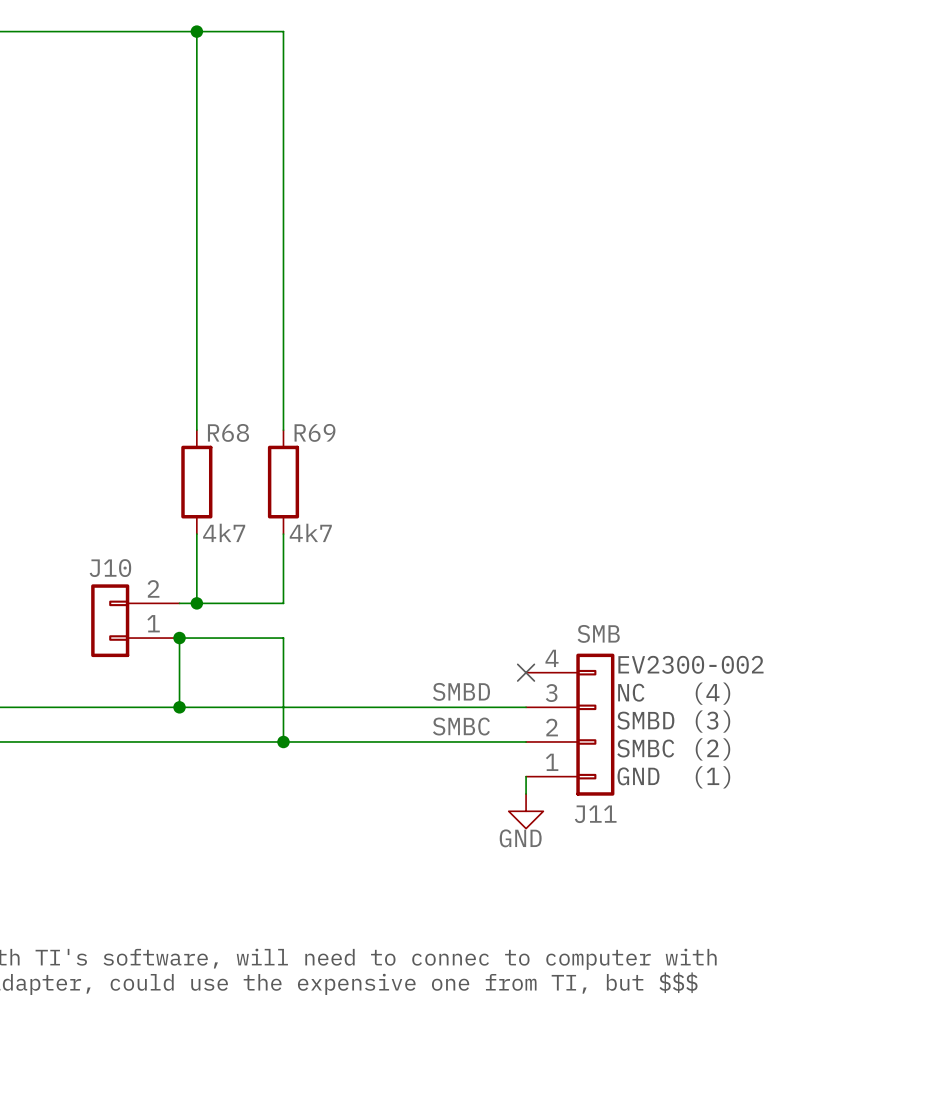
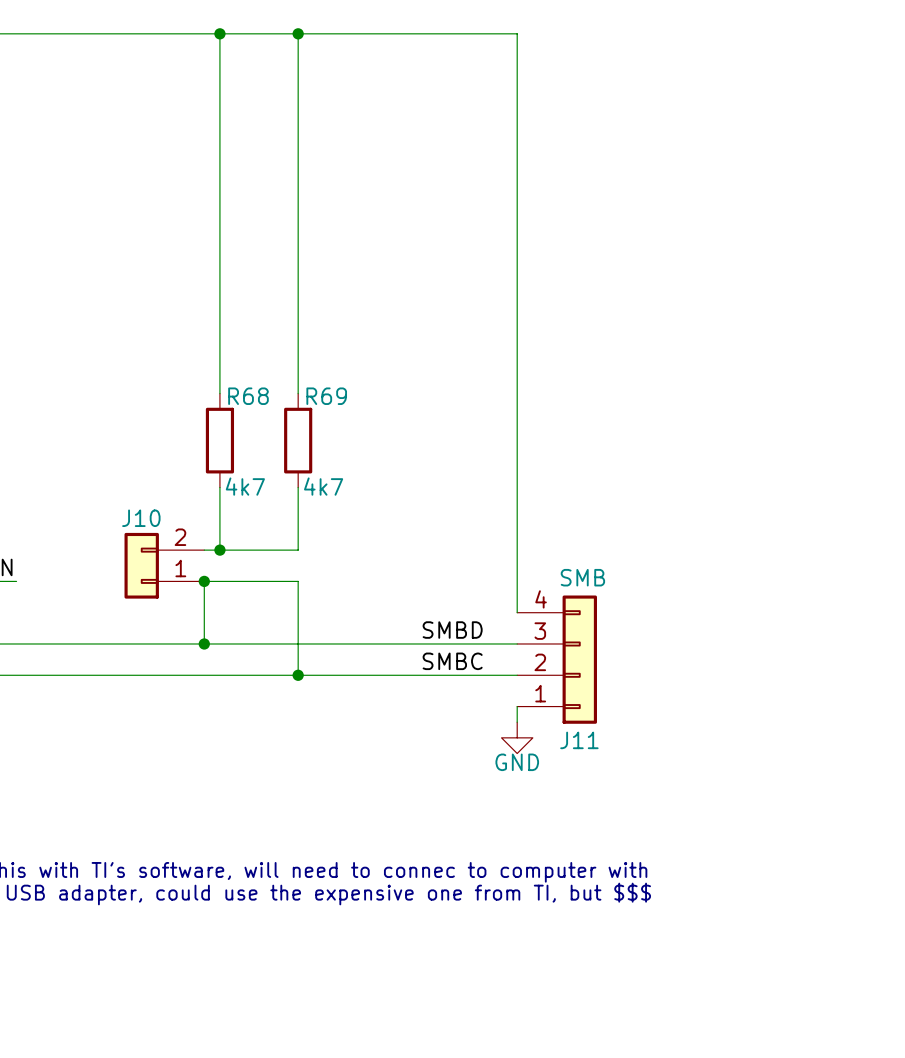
wire: none -> (298, 33) (517, 33) (517, 612)
junction: none -> (298, 33)
text: EV2300-002 (690, 664) -> none
no-connect mark: (526, 672) -> none
text: NC (4) (674, 693) -> none
text: SMBD (3) (673, 721) -> none
text: SMBC (2) (673, 749) -> none
text: GND (1) (673, 777) -> none

